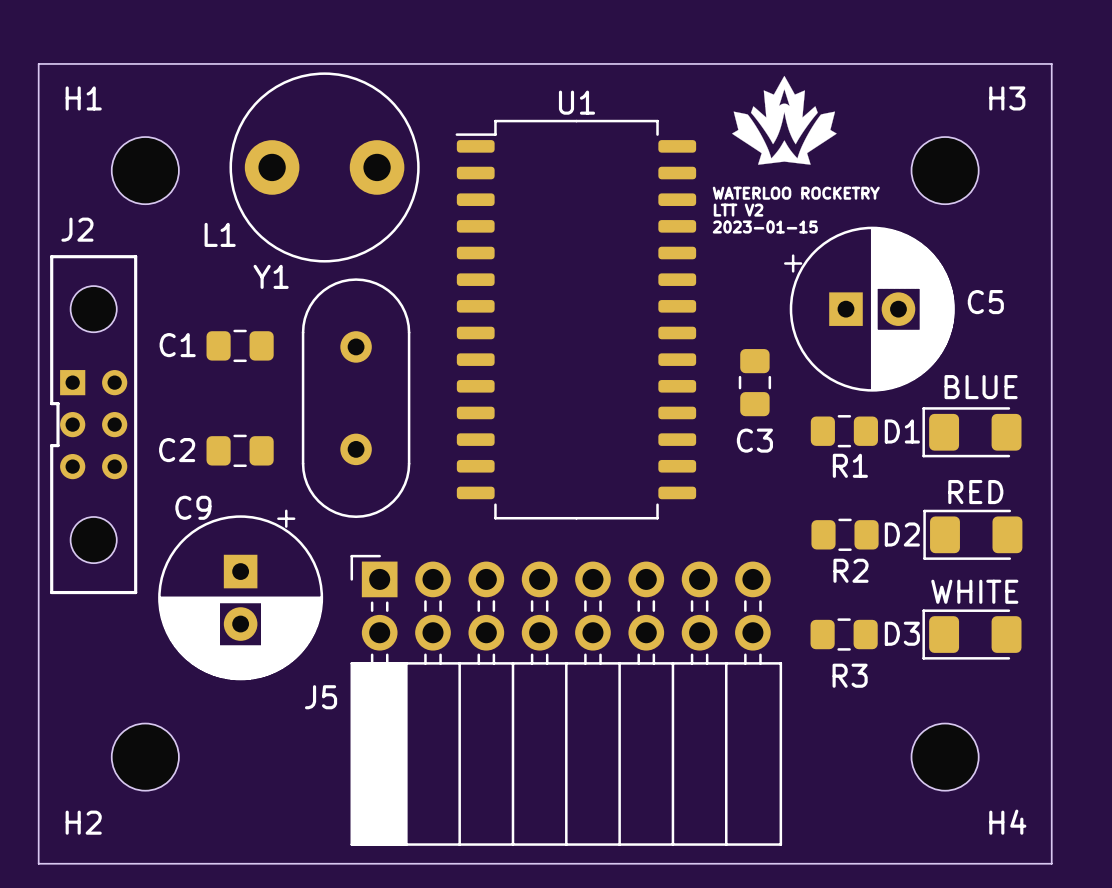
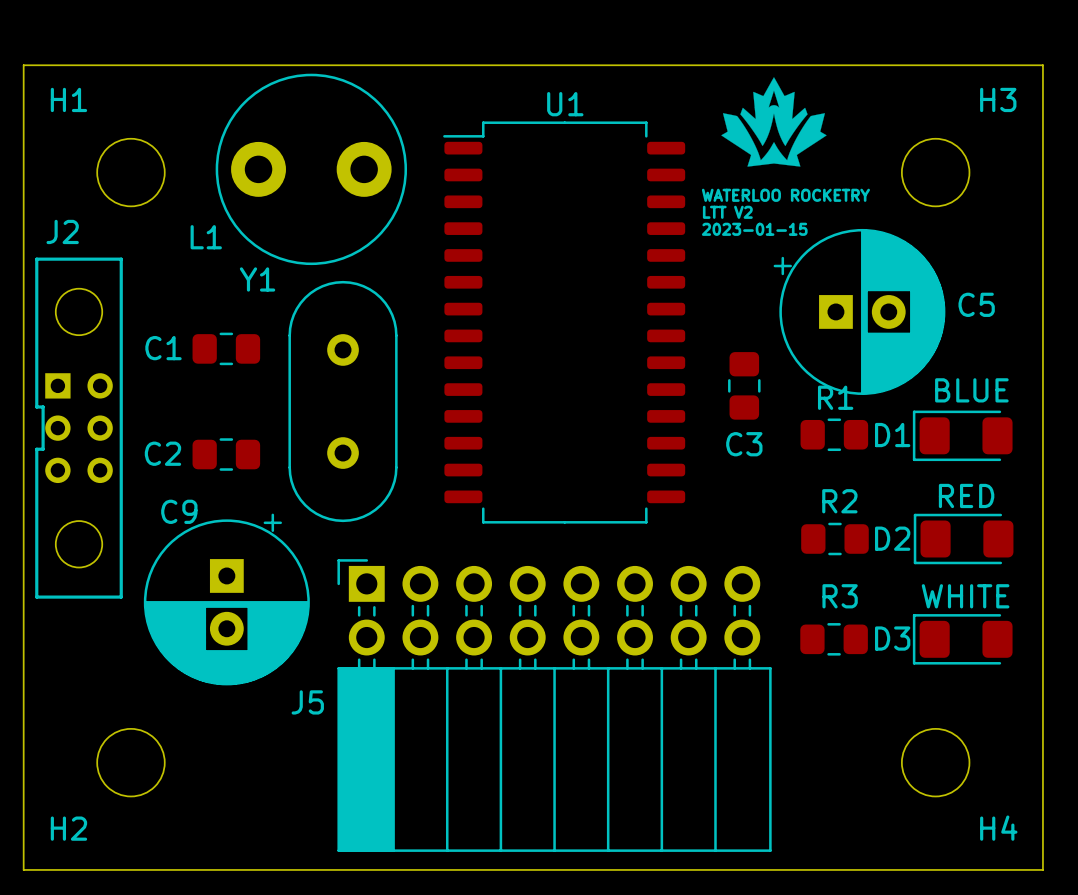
R1 name position: R1 (850, 465) -> R1 (835, 397)
R2 name position: R2 (851, 570) -> R2 (839, 501)
R3 name position: R3 (850, 675) -> R3 (840, 596)

